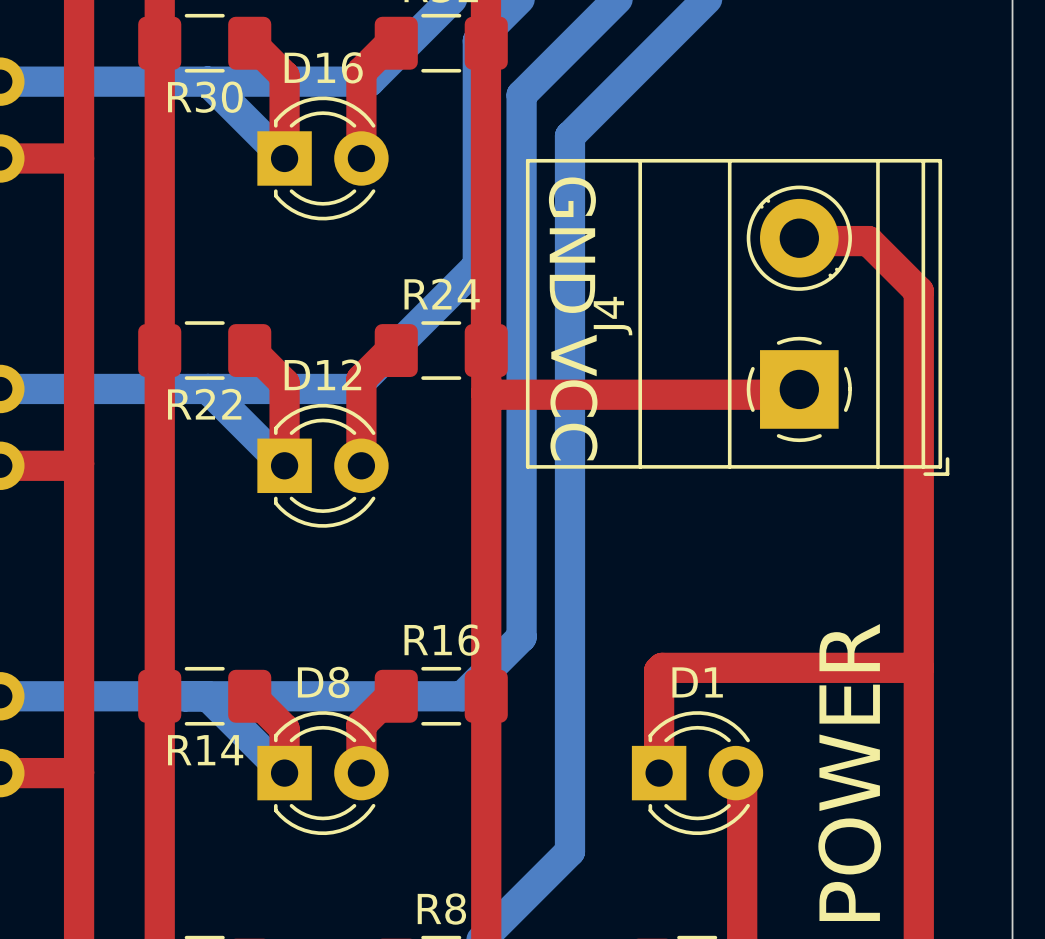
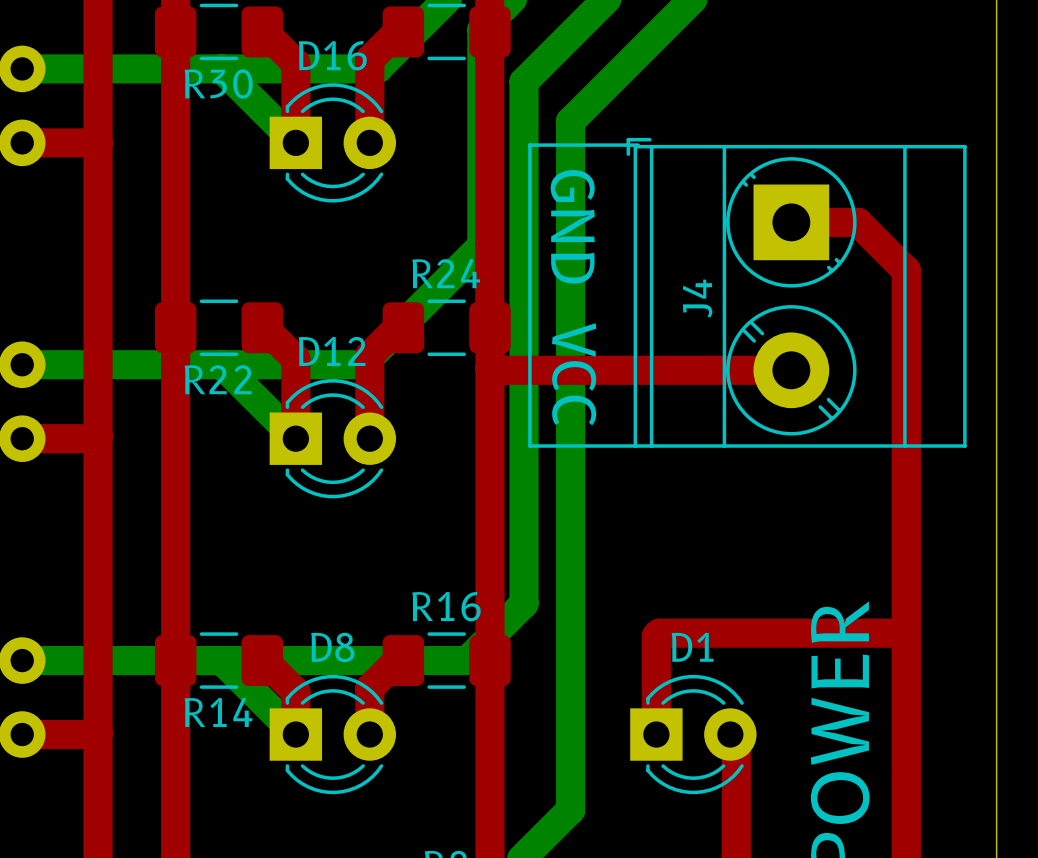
J4 footprint: [638, 158, 950, 476] -> [626, 137, 967, 448]
J4 name position: J4 (613, 316) -> J4 (697, 298)
line: (527, 466) (640, 466) -> (529, 439) (529, 446)
line: none -> (529, 445) (635, 445)

